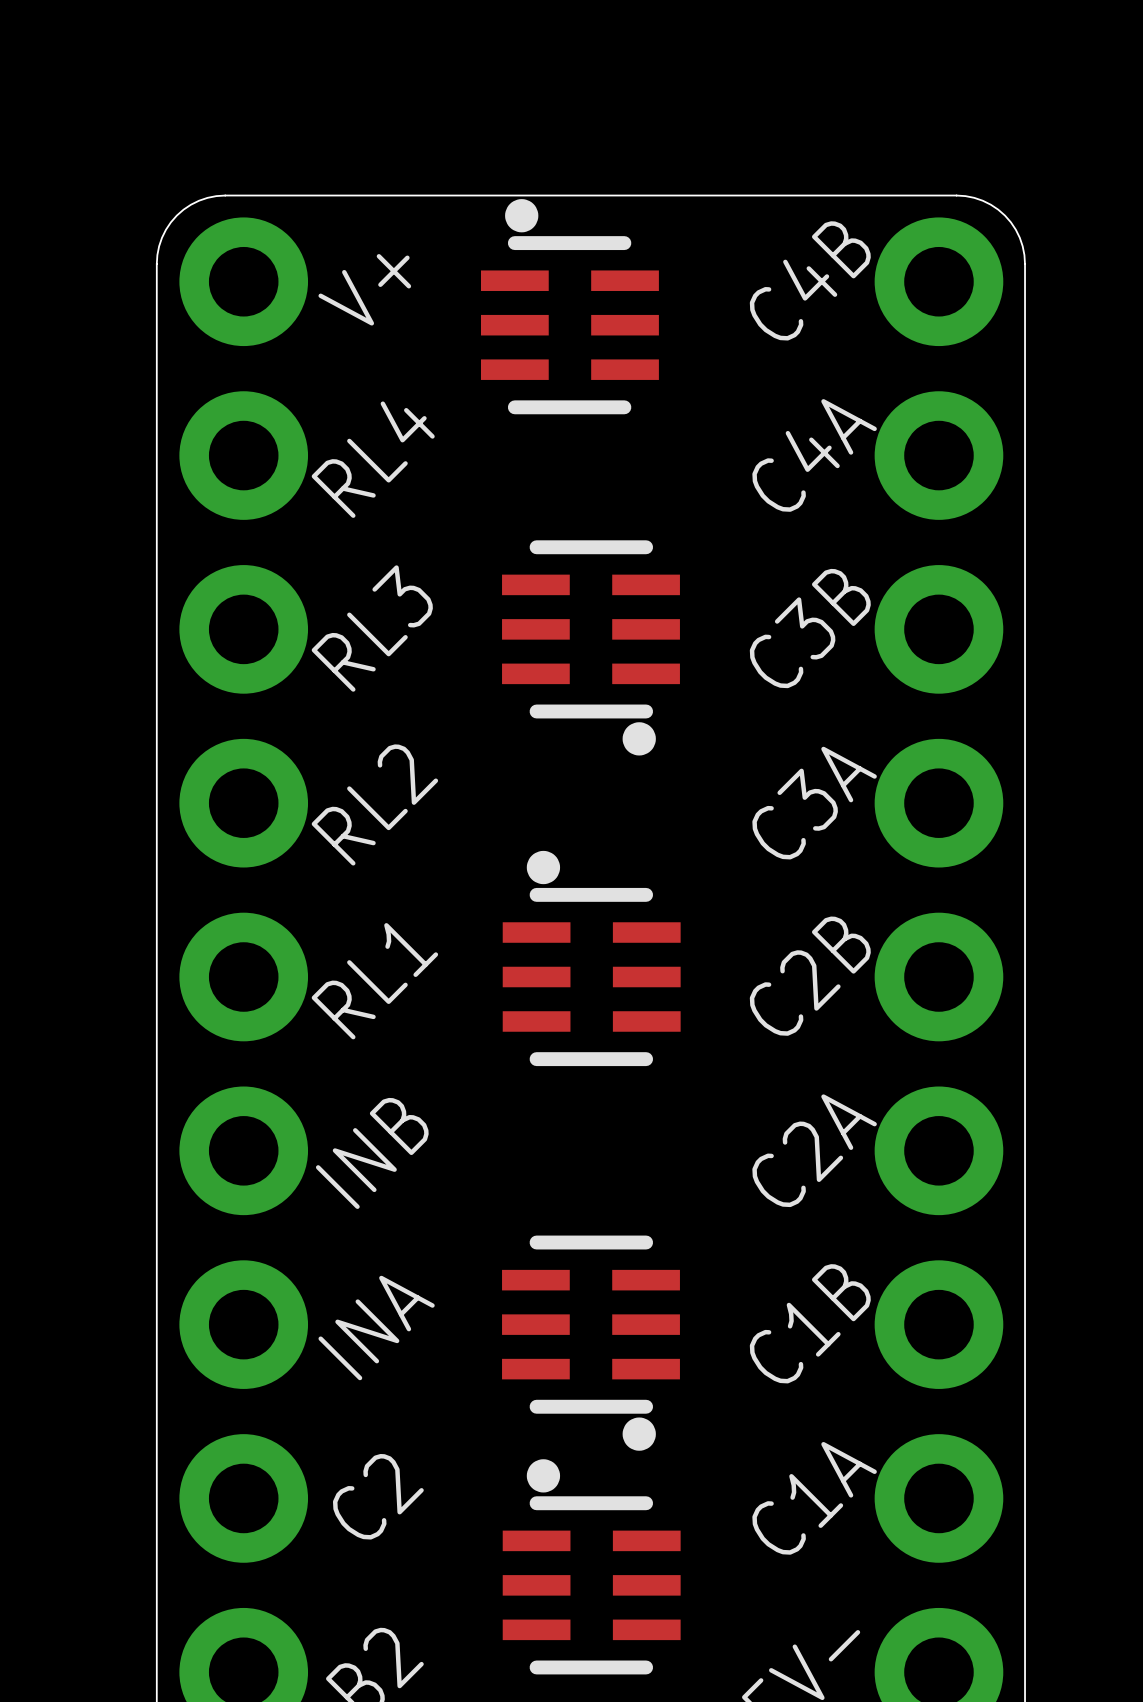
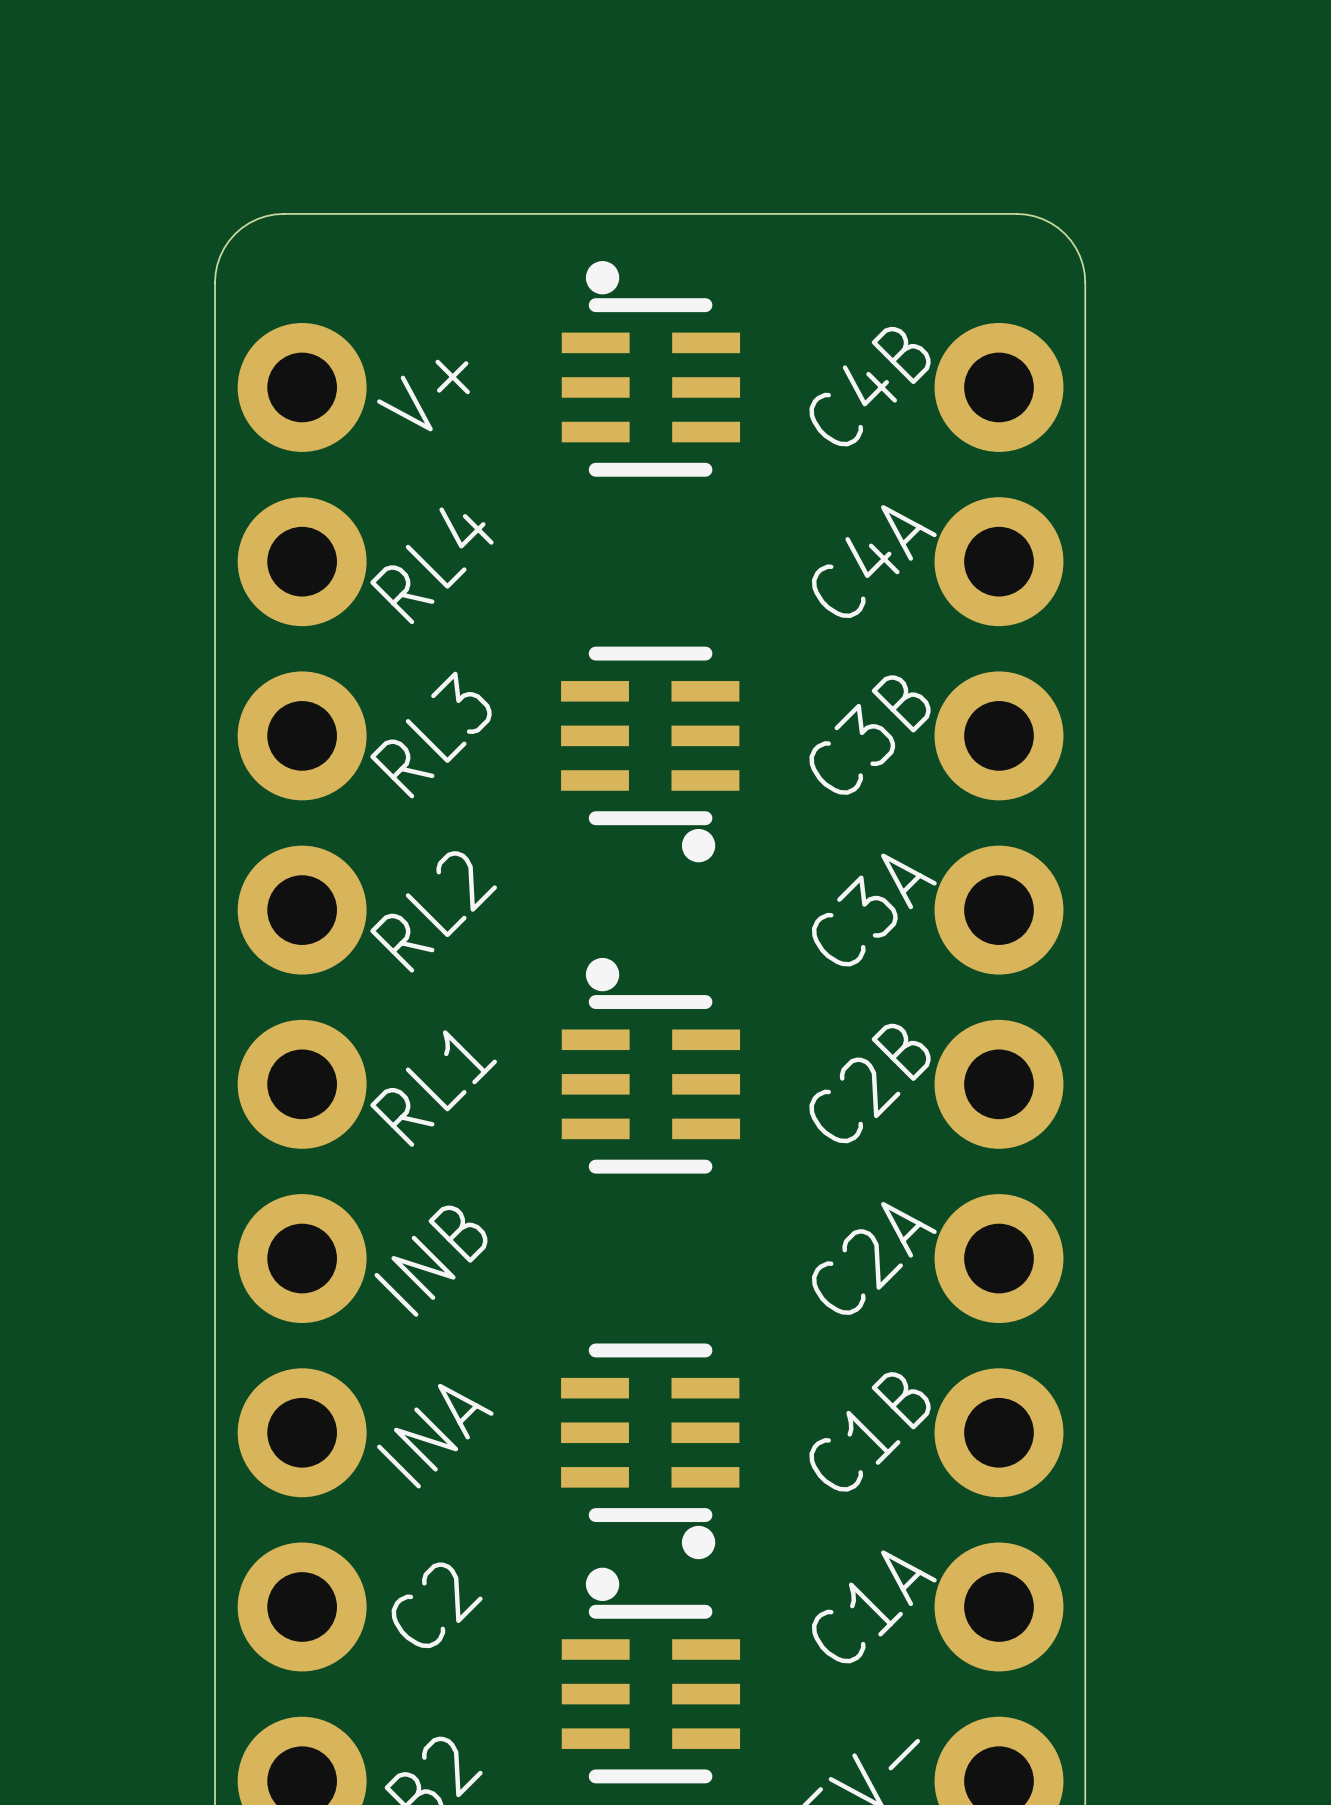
board edge: (156, 263) (162, 237) (176, 215) (199, 200) (225, 195) (965, 196) (990, 204) (1010, 222) (1019, 237) (1025, 263) -> (215, 369) (215, 282) (220, 256) (229, 240) (241, 228) (257, 219) (283, 213) (1025, 214) (1042, 219) (1058, 228) (1071, 240) (1080, 256) (1085, 282) (1085, 369)
part position: (569, 306) -> (650, 368)

